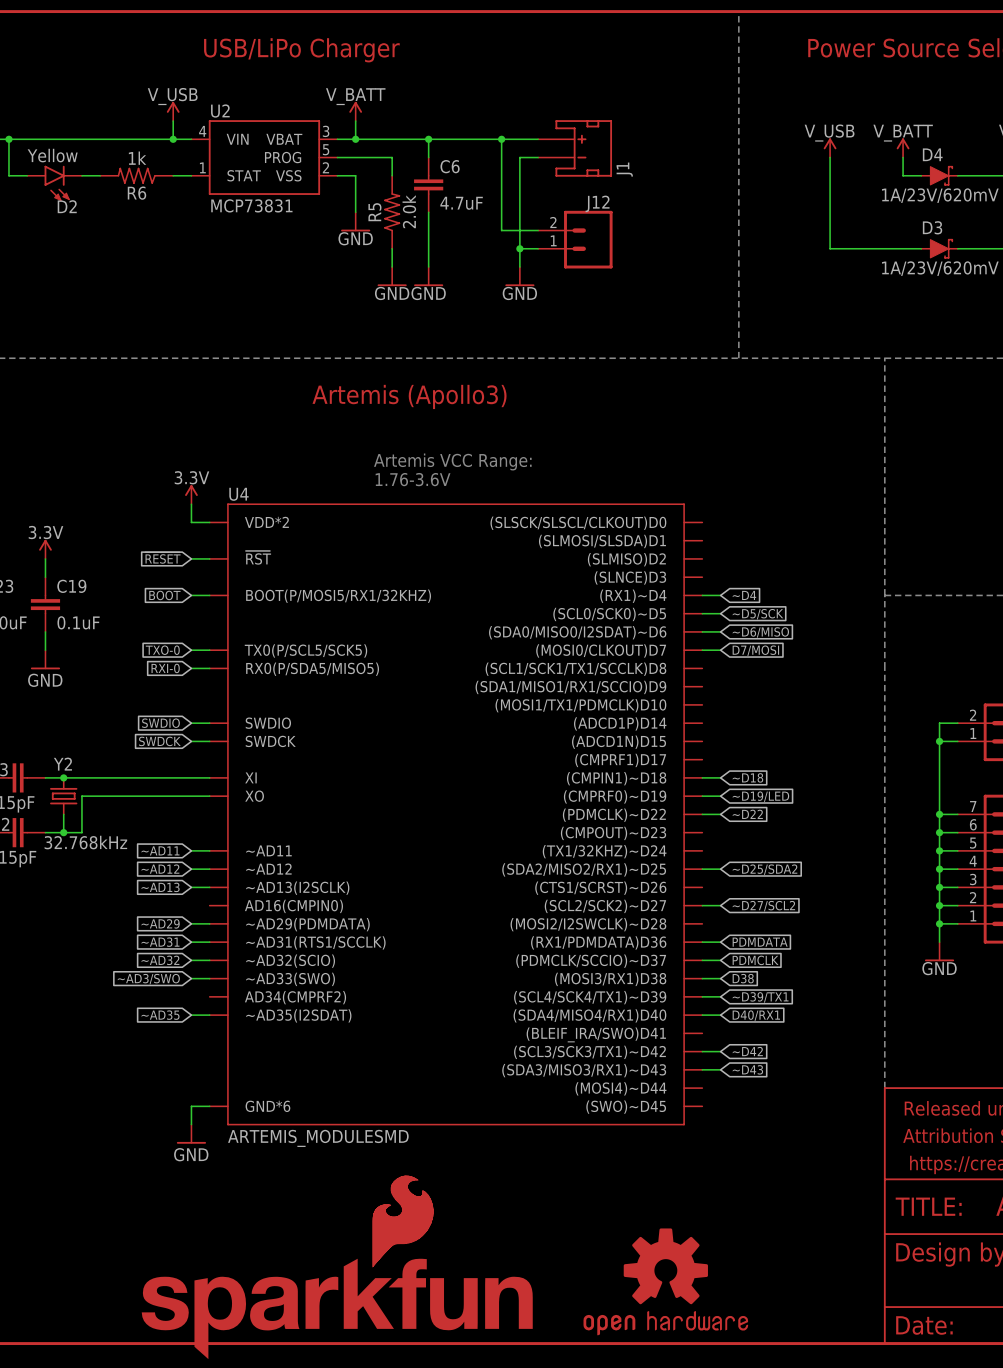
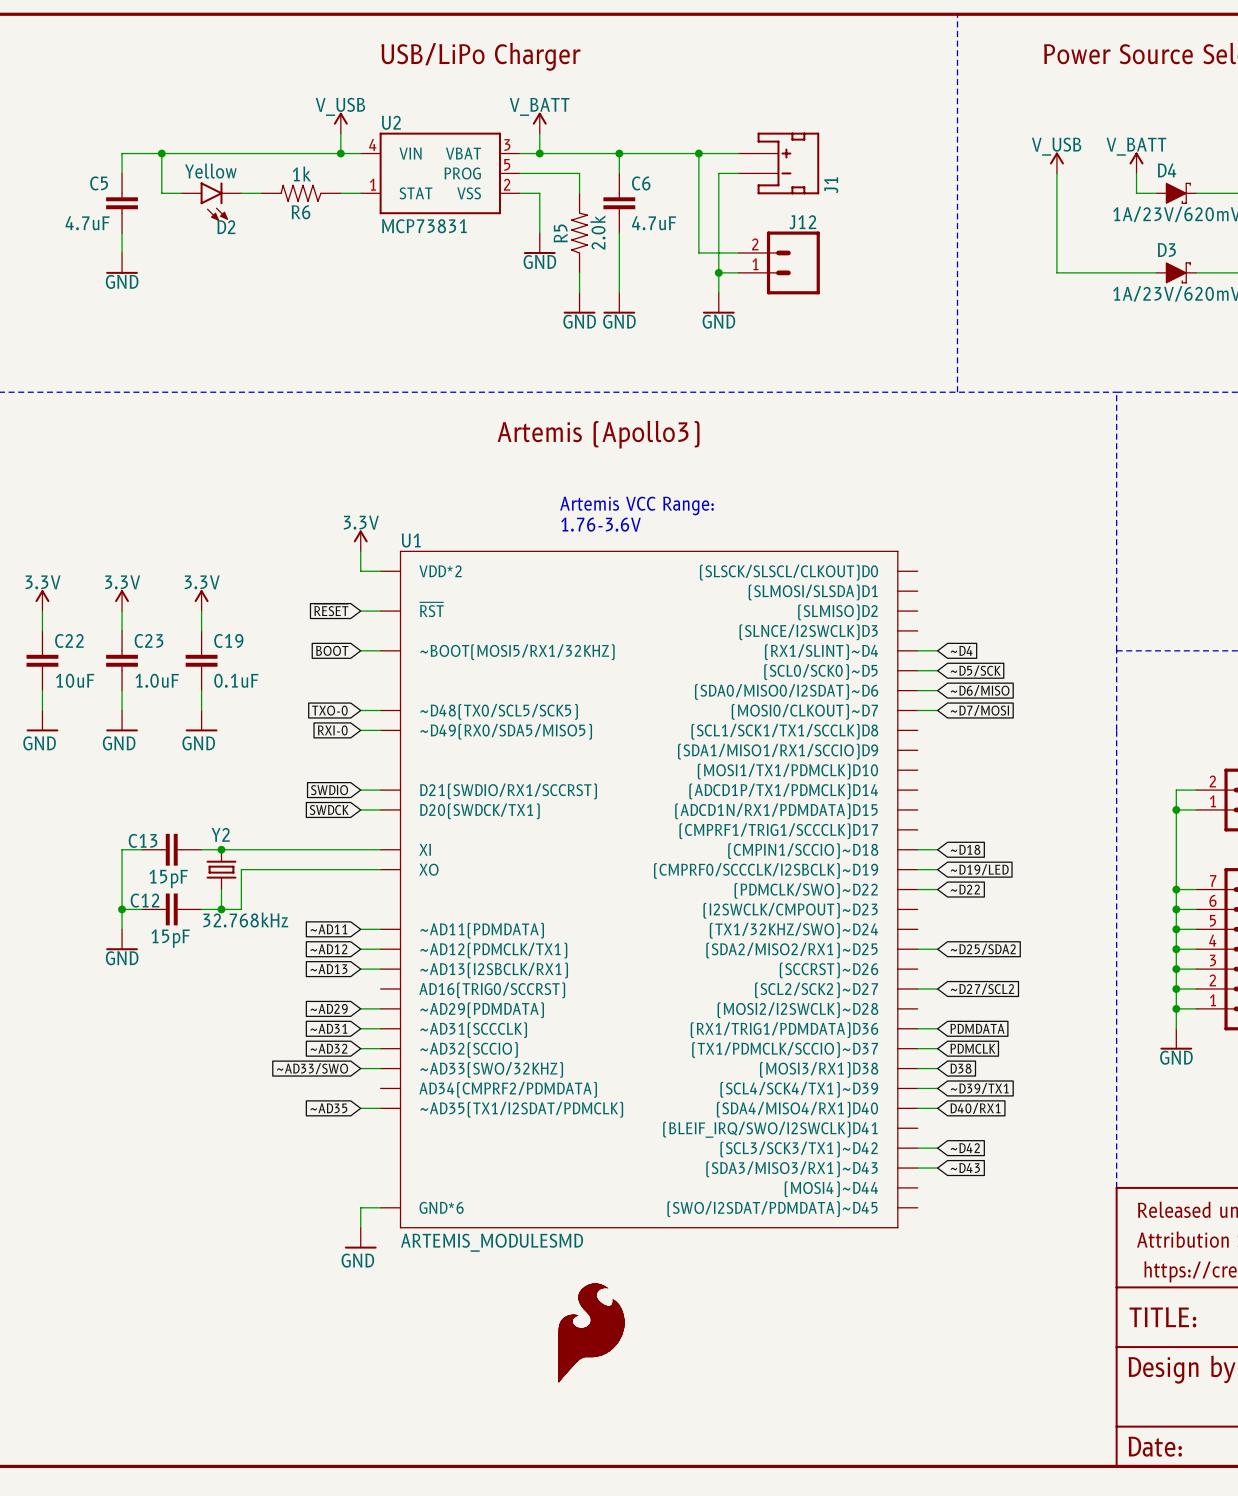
U4 name: U4 (238, 494) -> U1 (411, 540)
U4 symbol: [209, 503, 703, 1126] -> [380, 550, 918, 1229]
global label: D7/MOSI (755, 650) -> ~D7/MOSI (979, 710)
global label: ~AD3/SWO (148, 979) -> ~AD33/SWO (312, 1068)
part: (337, 1267) -> none
part: (665, 1281) -> none

